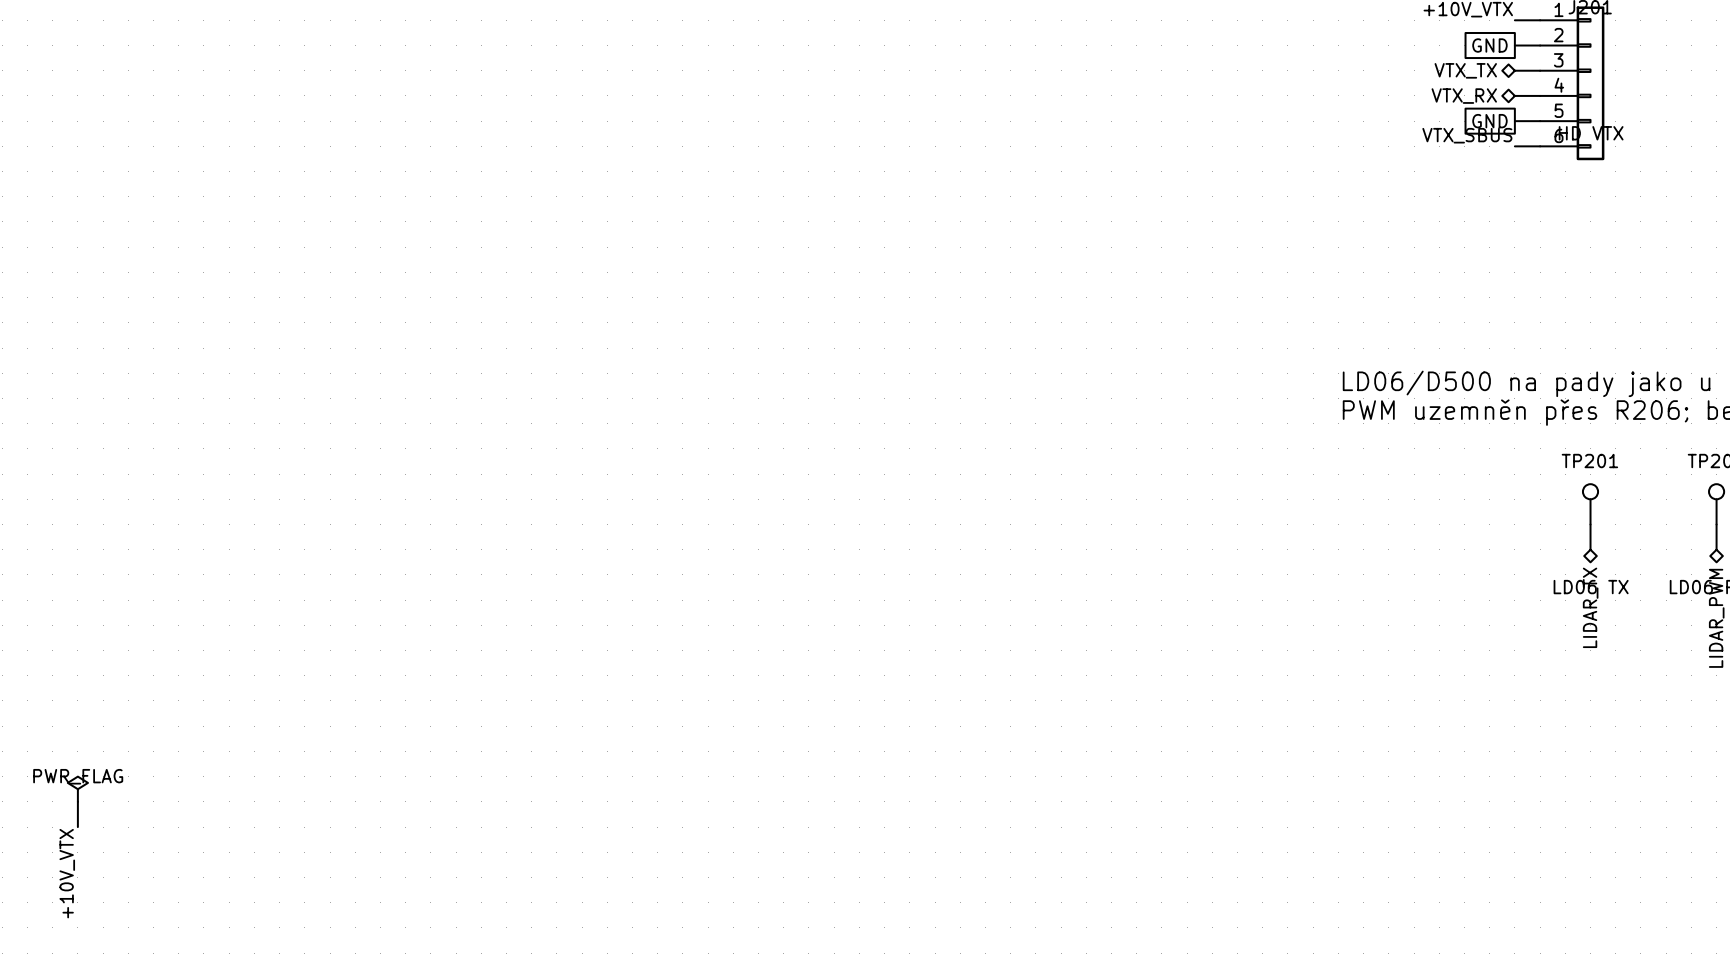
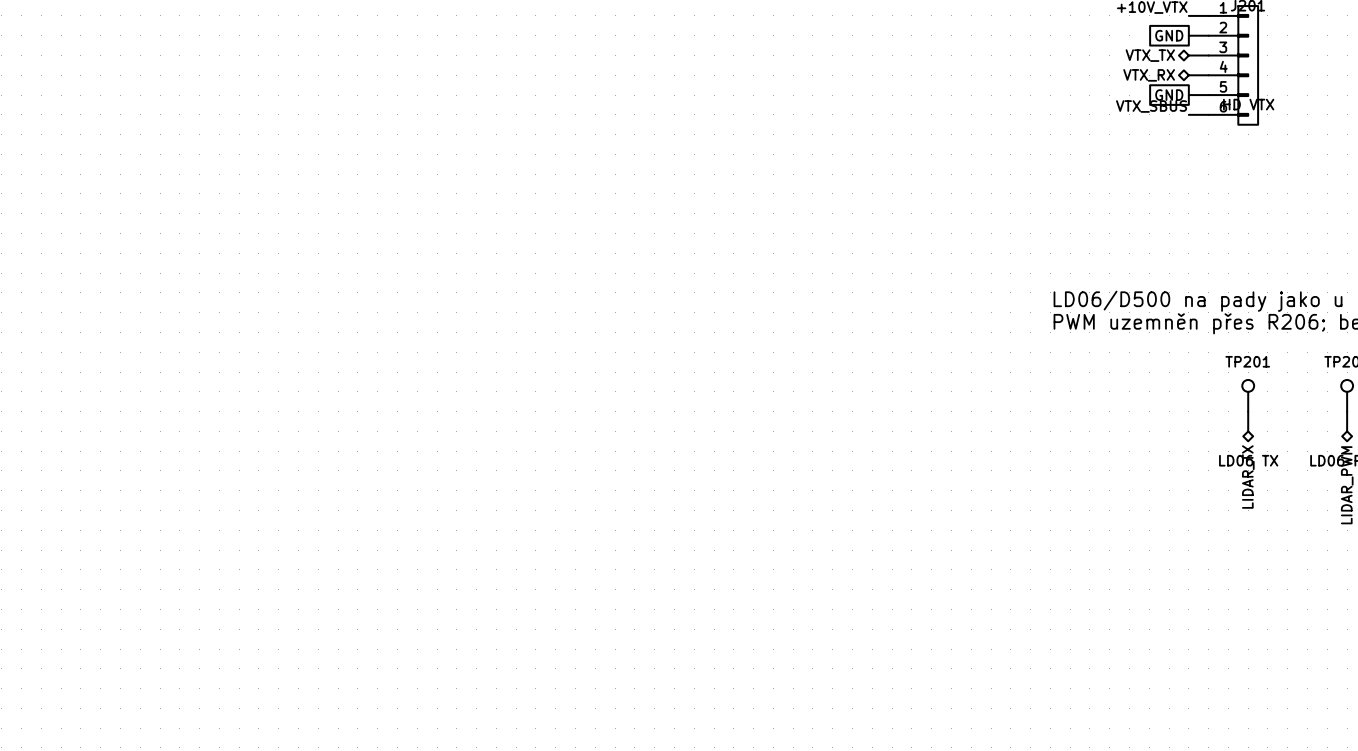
power symbol: PWR_FLAG (77, 789) -> none
wire: (77, 801) (77, 827) -> none
label: +10V_VTX (67, 873) -> none

